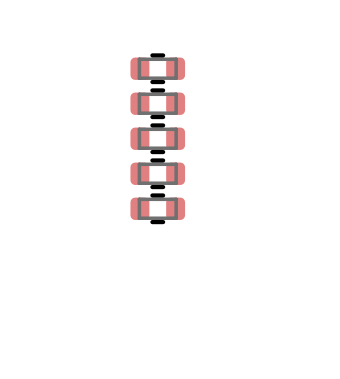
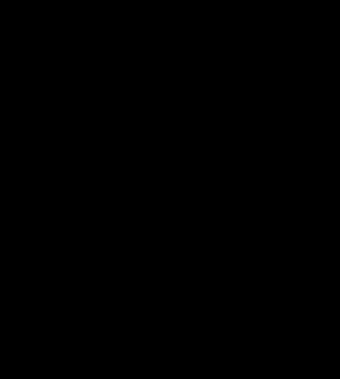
part: (157, 68) -> none
part: (157, 103) -> none
part: (157, 138) -> none
part: (157, 173) -> none
part: (157, 208) -> none

